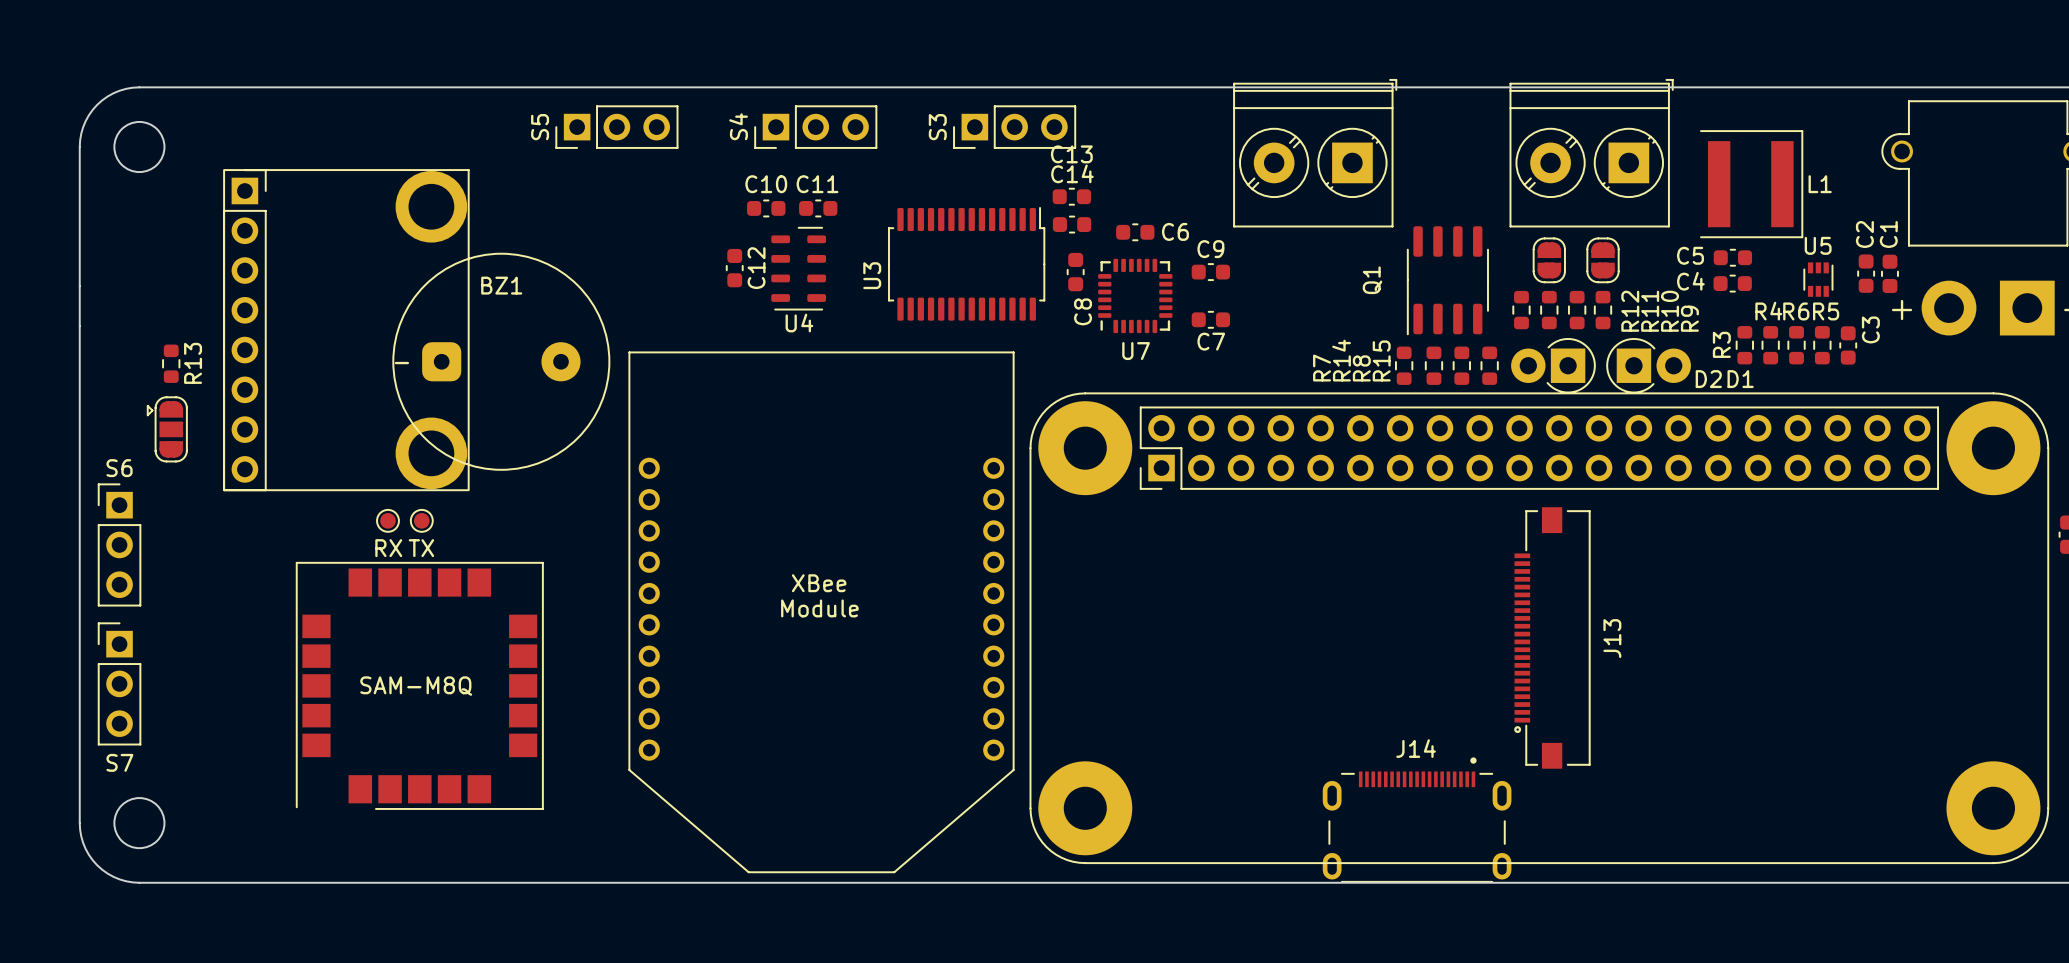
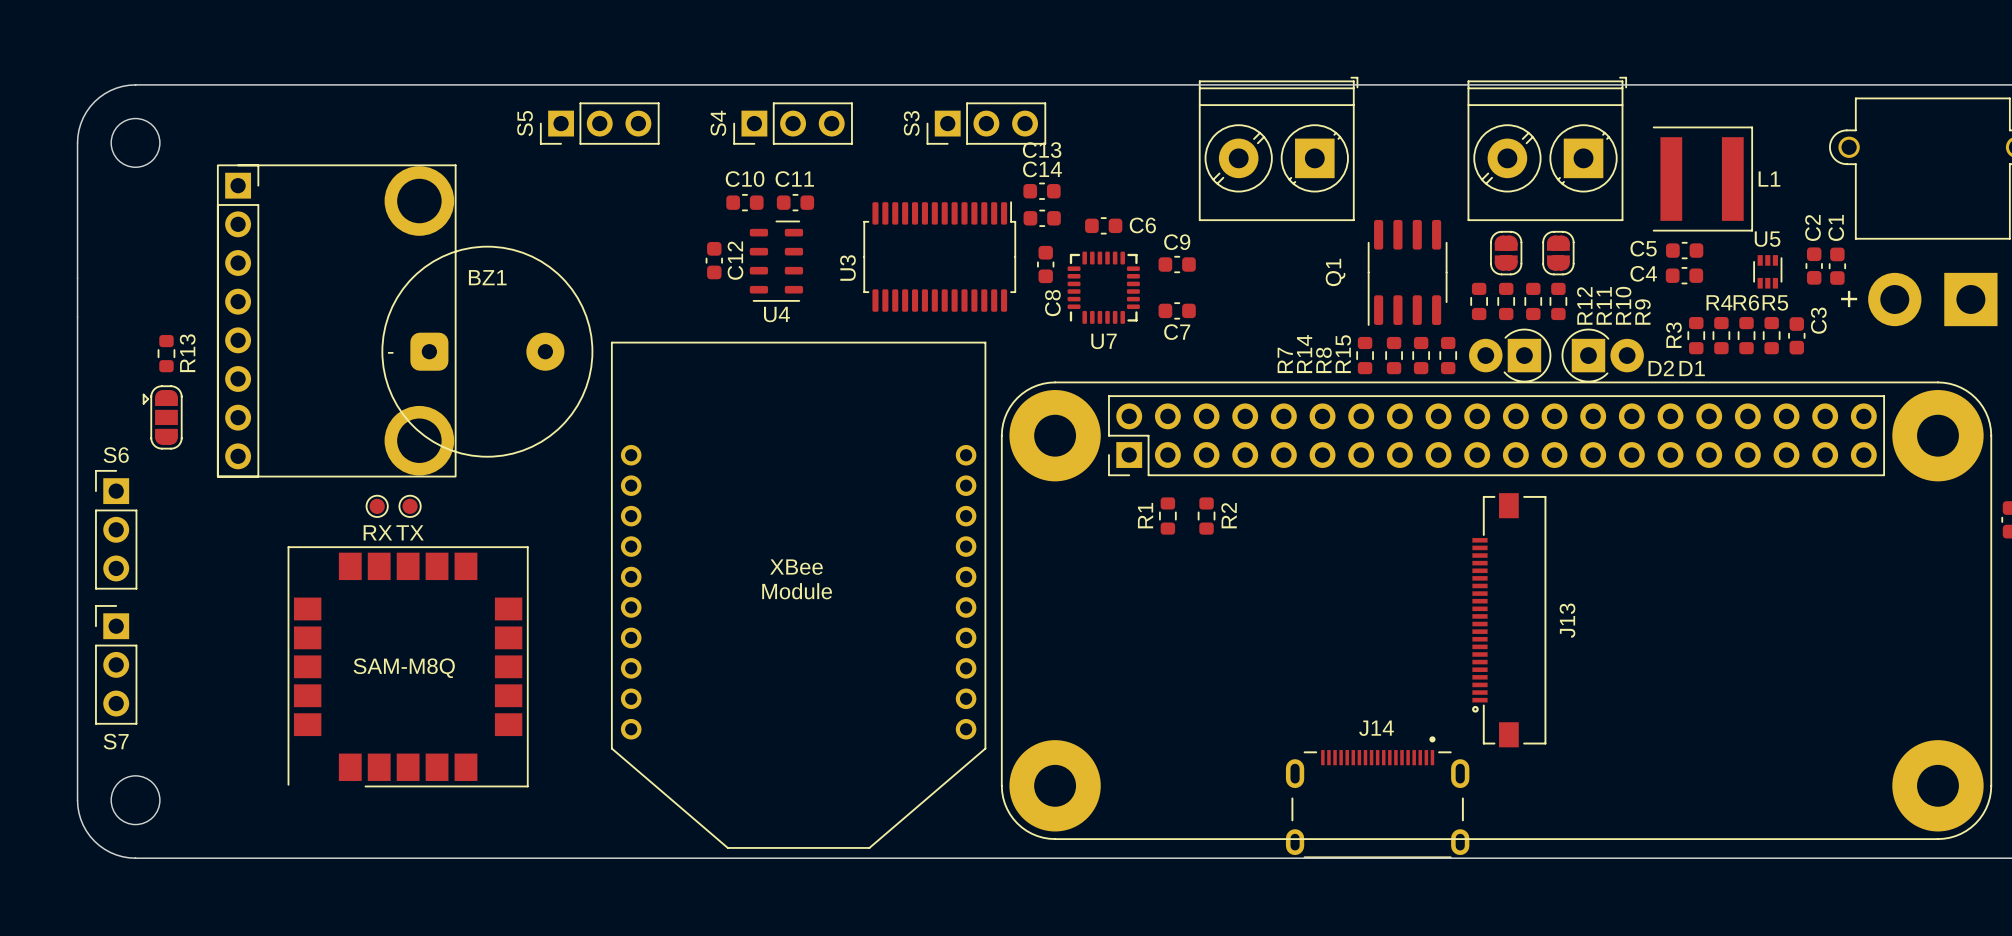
R1: none -> (1167, 516)
R2: none -> (1206, 516)

